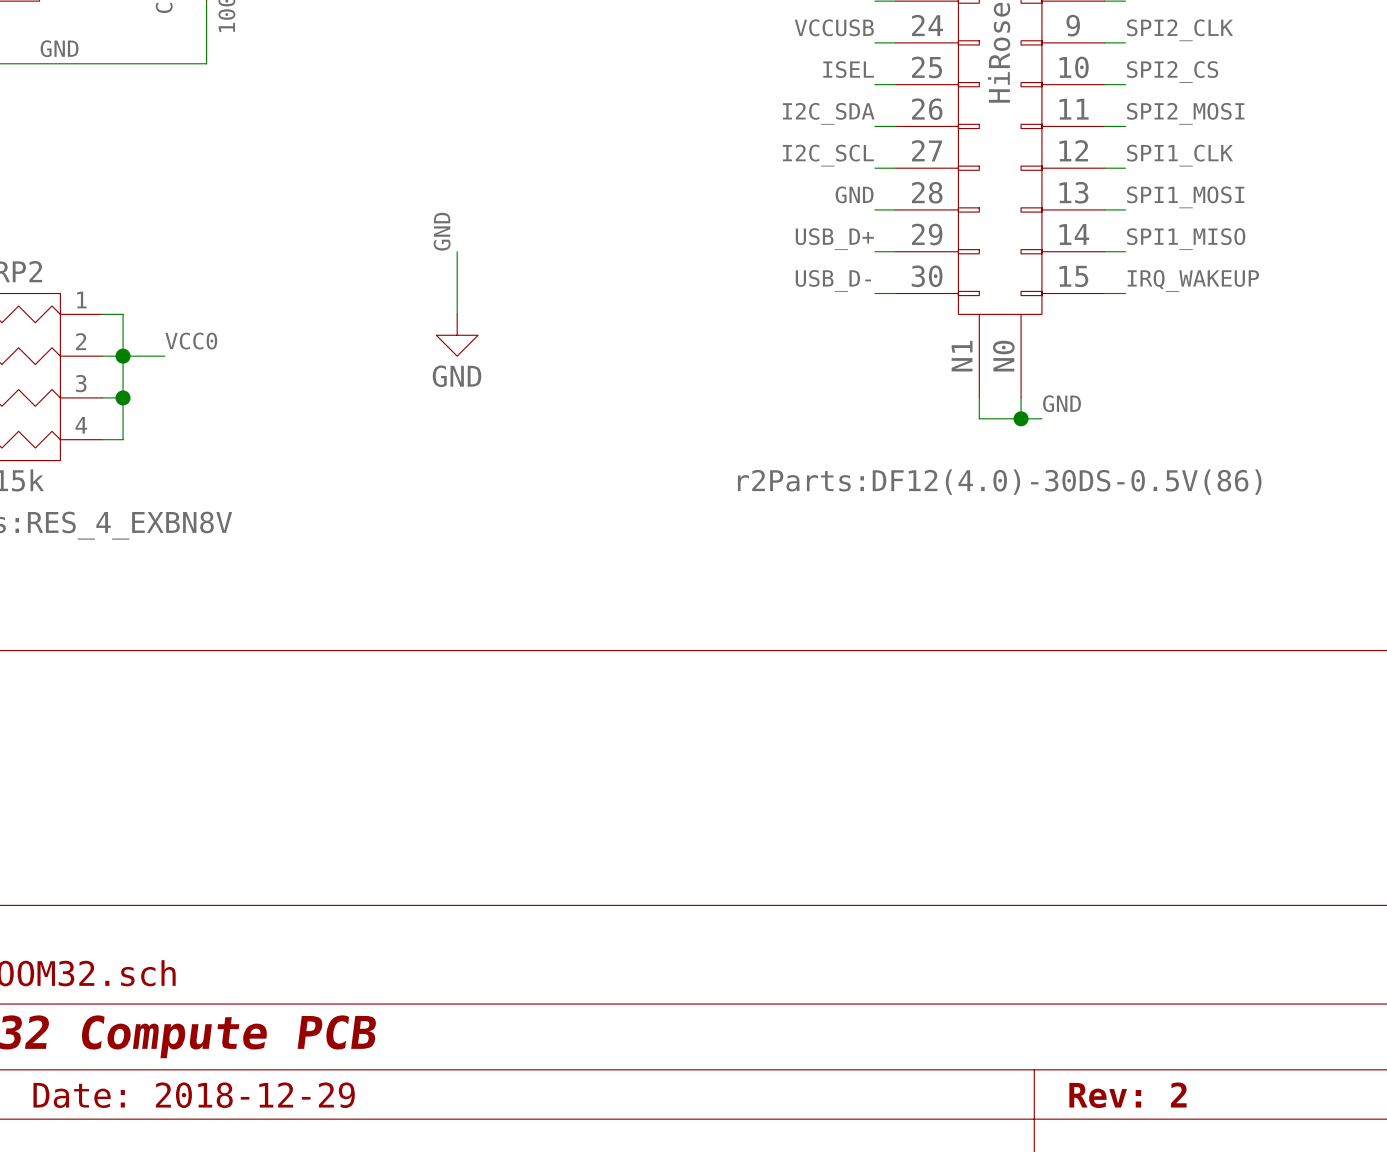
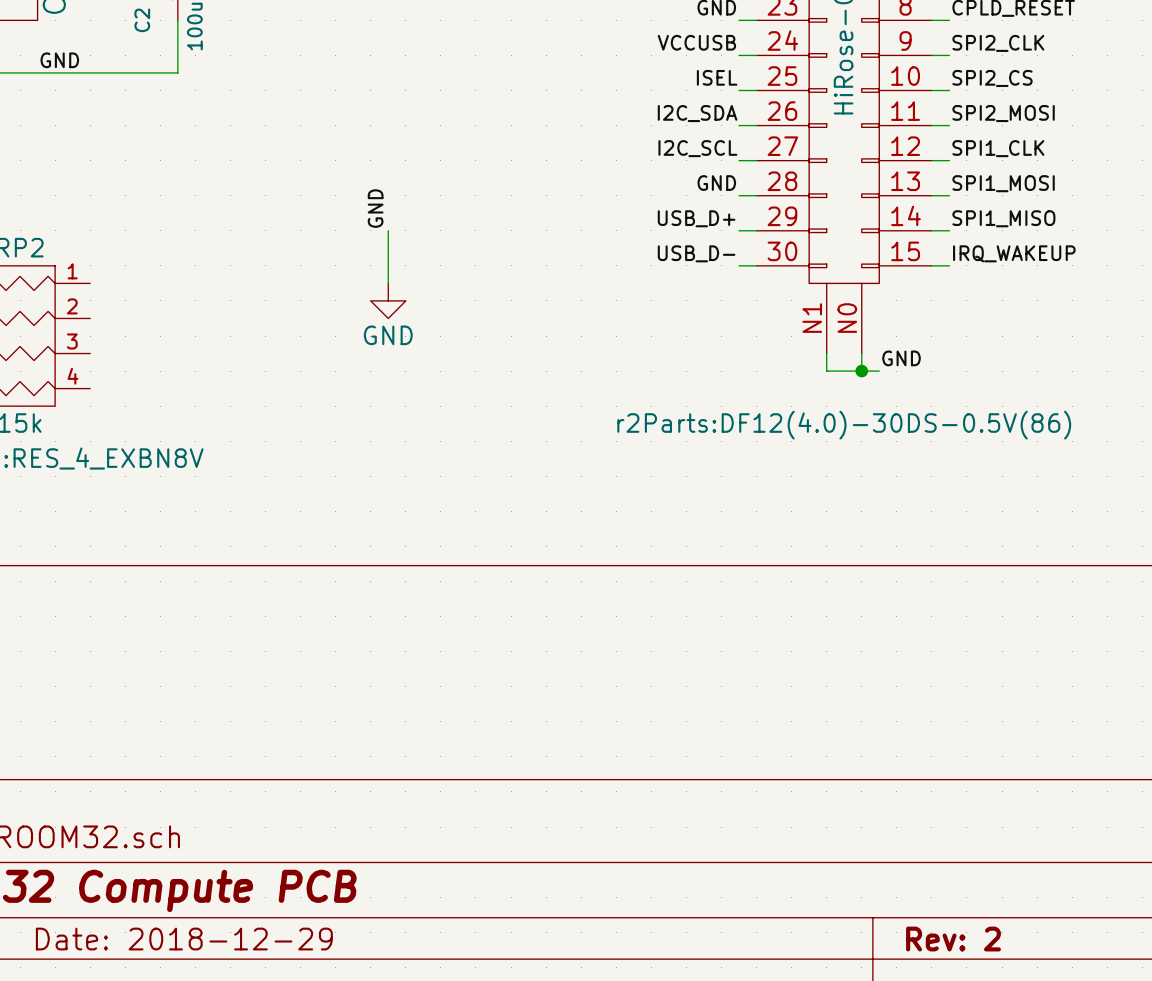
wire: (102, 314) (123, 314) (123, 439) (102, 439) -> none
label: VCC0 (191, 341) -> none
wire: (102, 356) (164, 356) -> none
junction: (123, 356) -> none
wire: (102, 397) (123, 397) -> none
junction: (123, 397) -> none

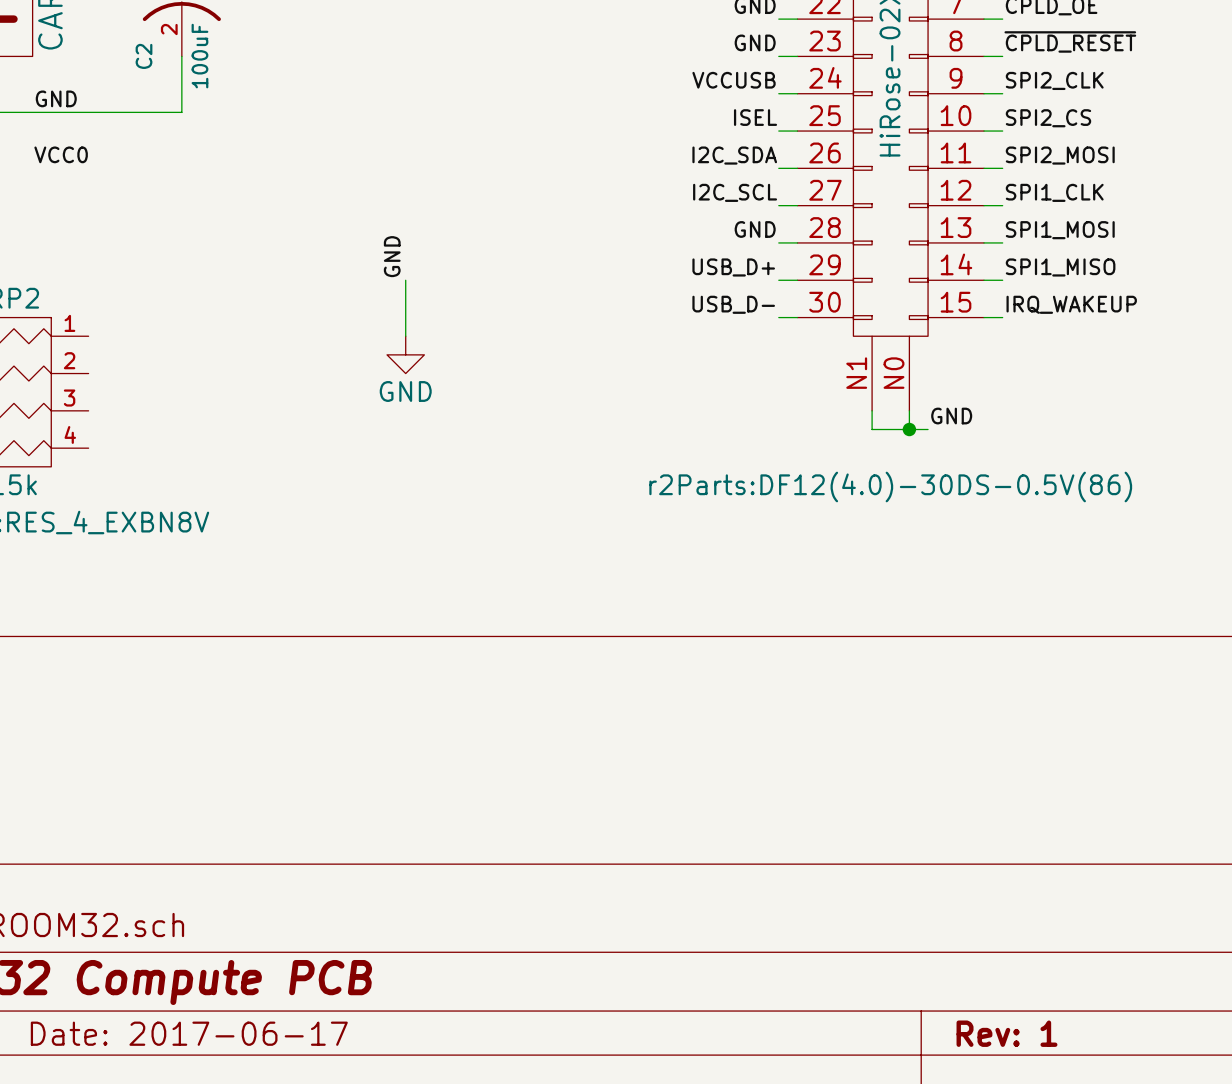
label: none -> VCC0 (61, 154)
title block: Date: 2018-12-29 (184, 939) -> Date: 2017-06-17 (189, 1033)
title block: Rev: 2 (953, 939) -> Rev: 1 (1006, 1033)

